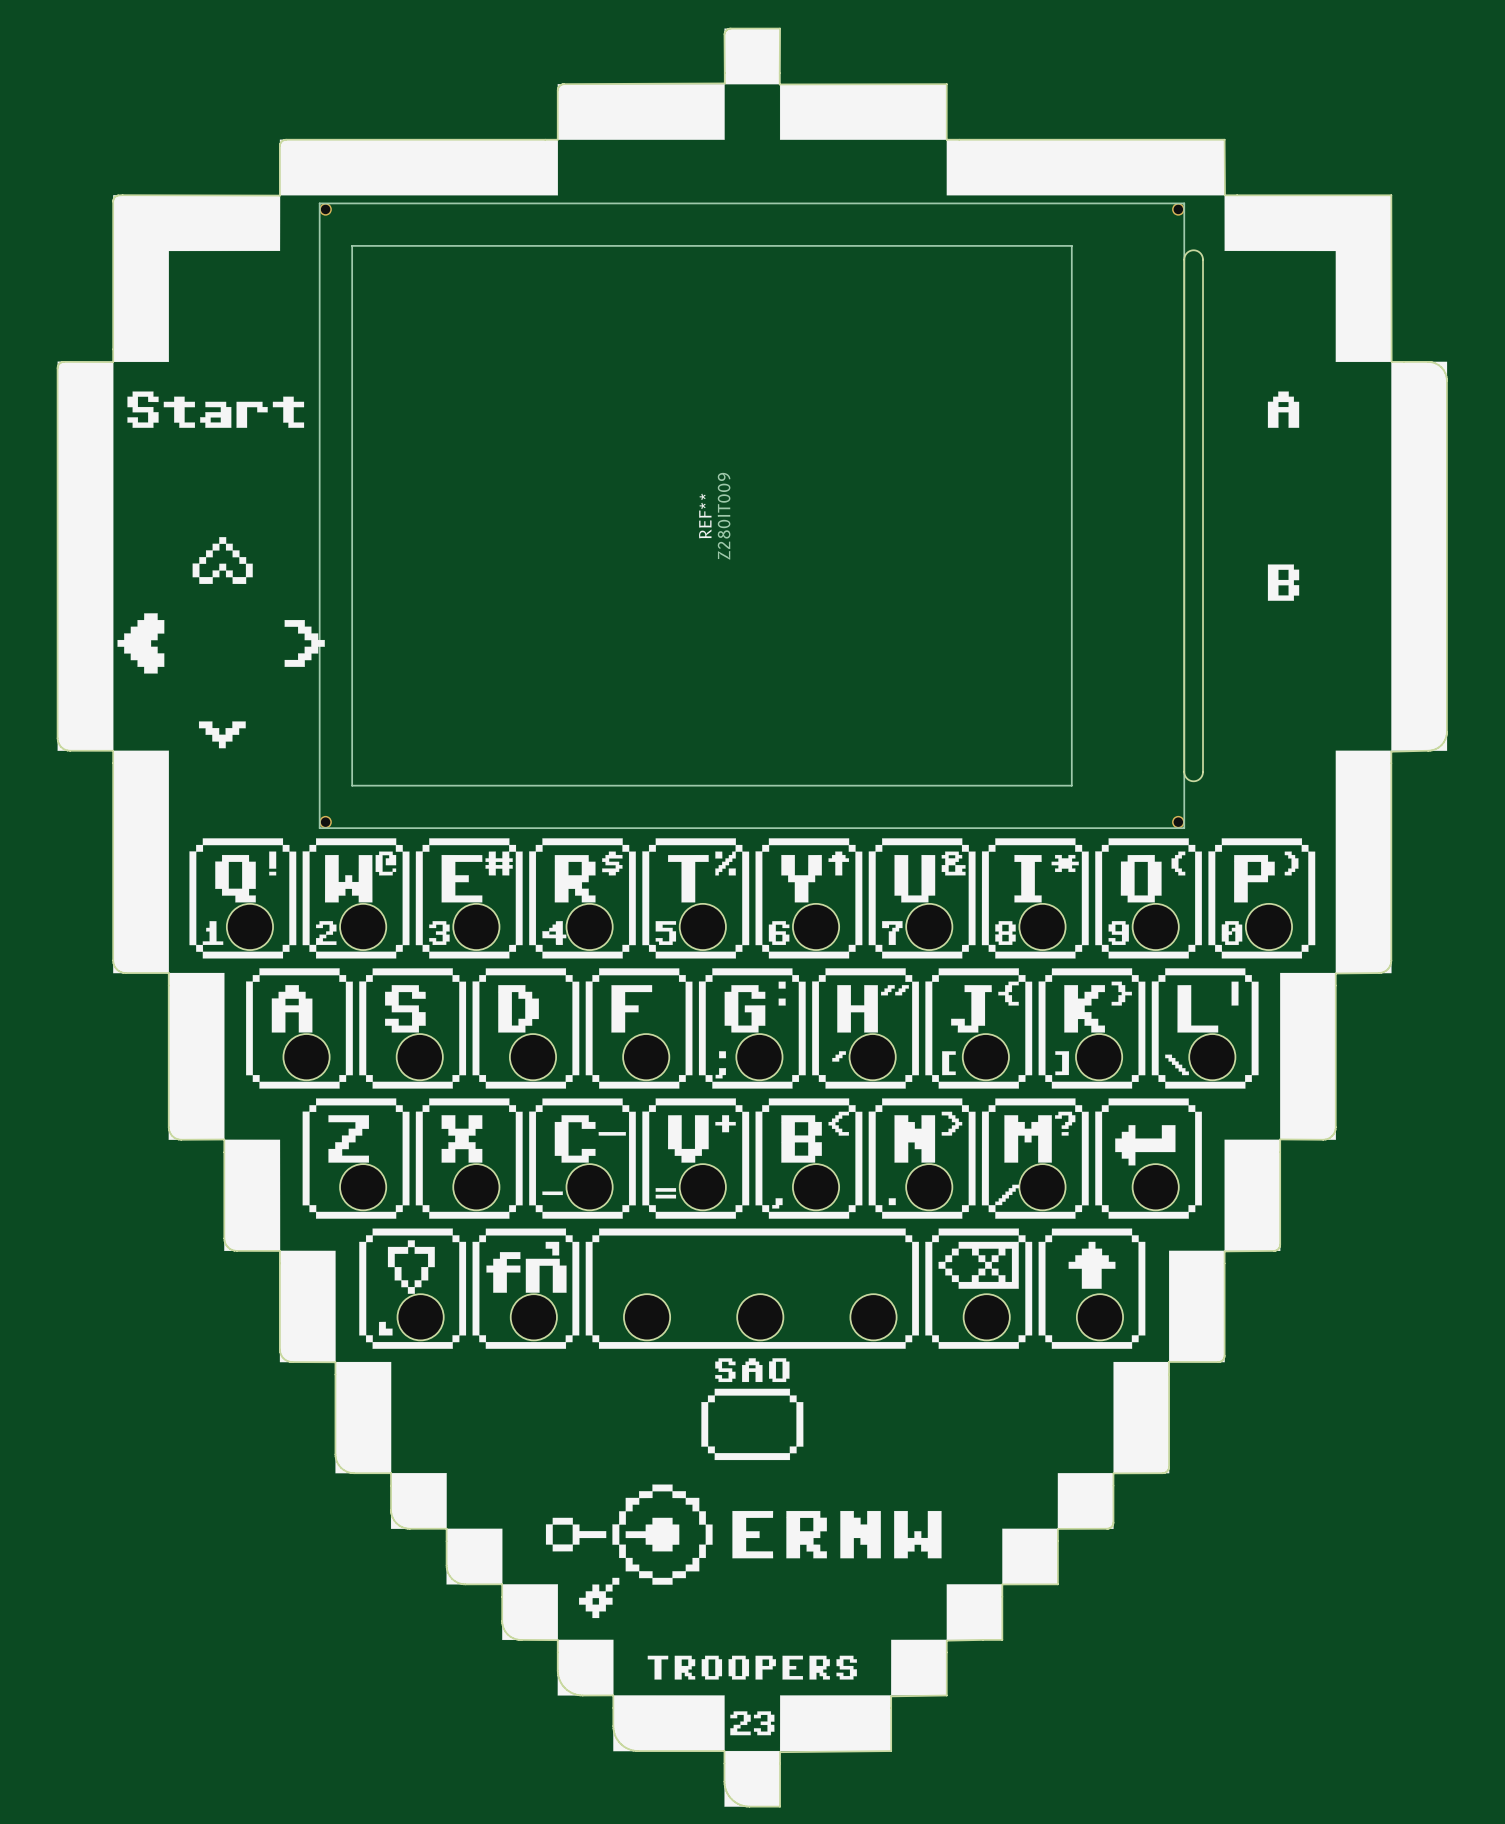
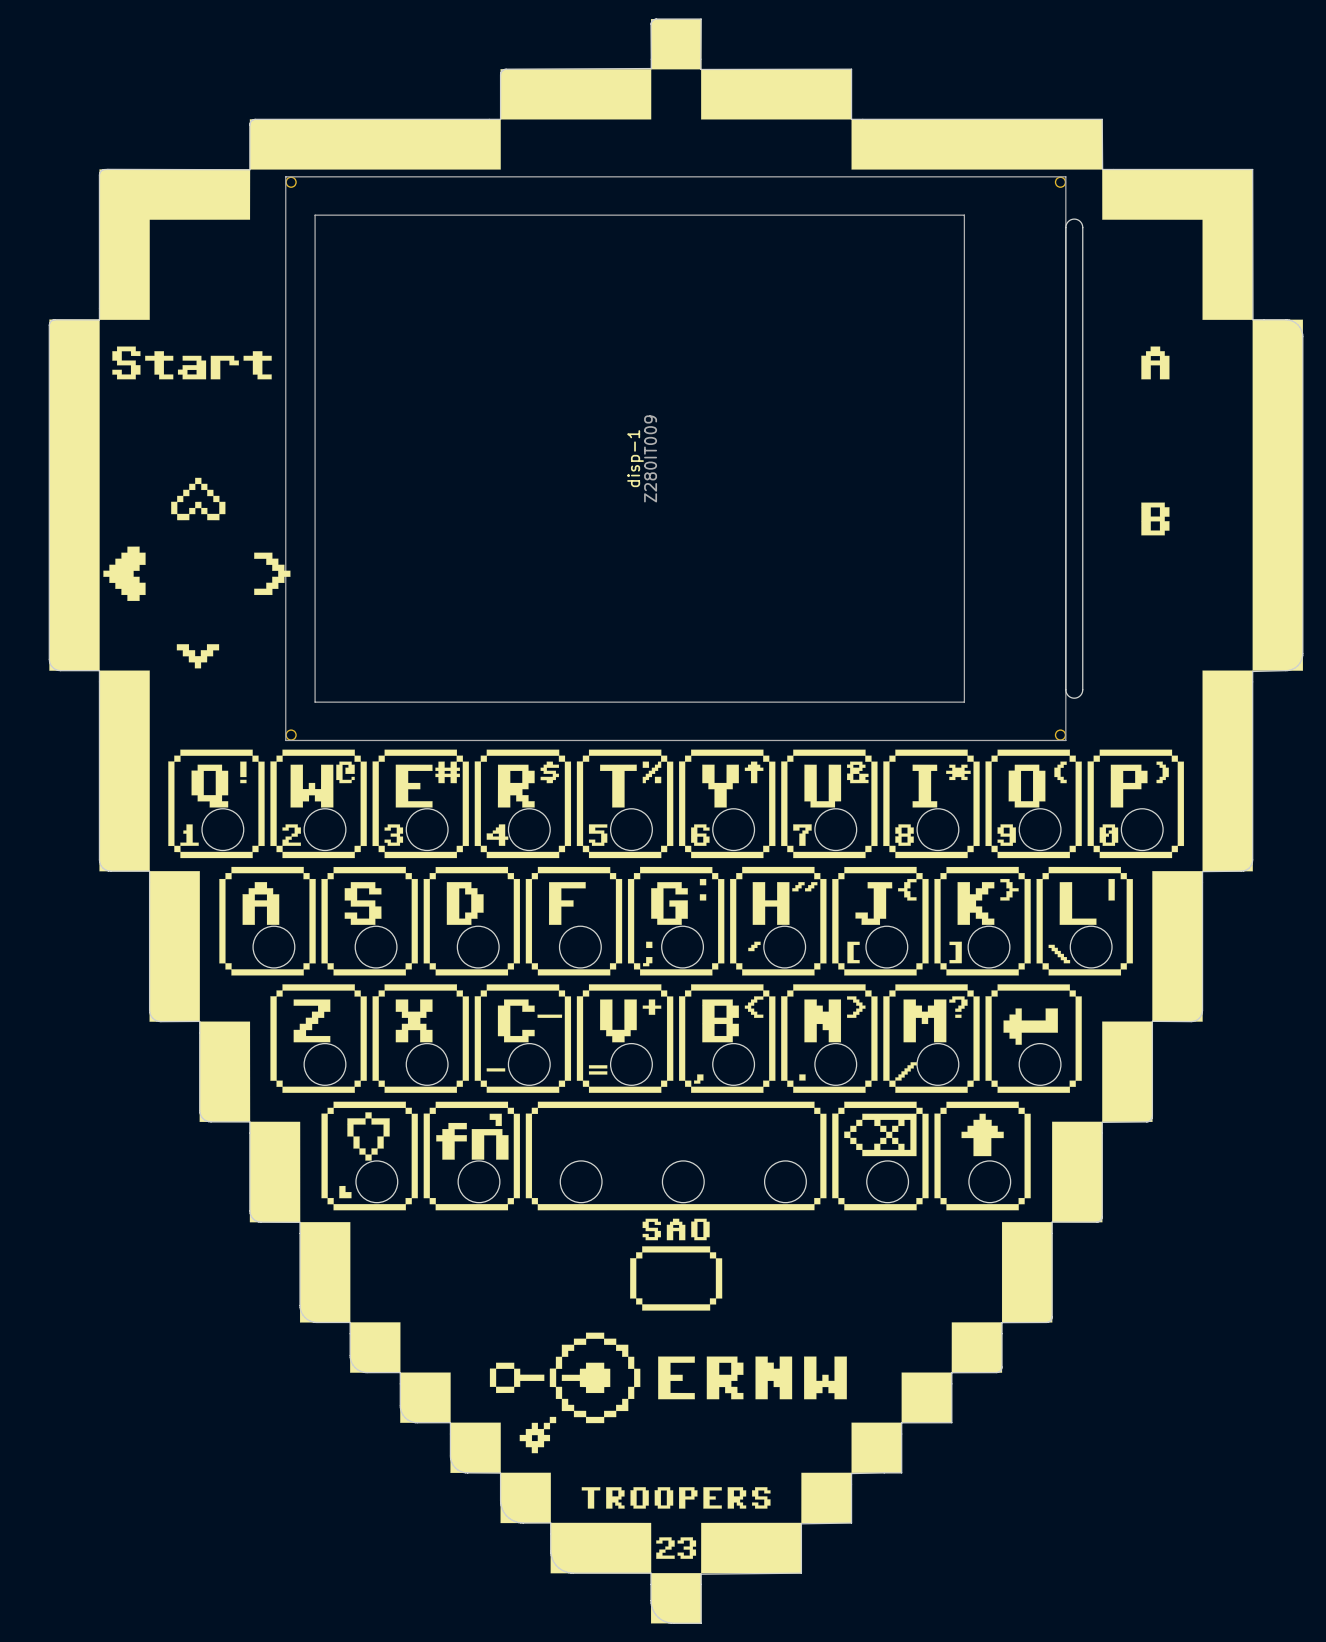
REF** name: REF** (705, 516) -> disp-1 (635, 458)

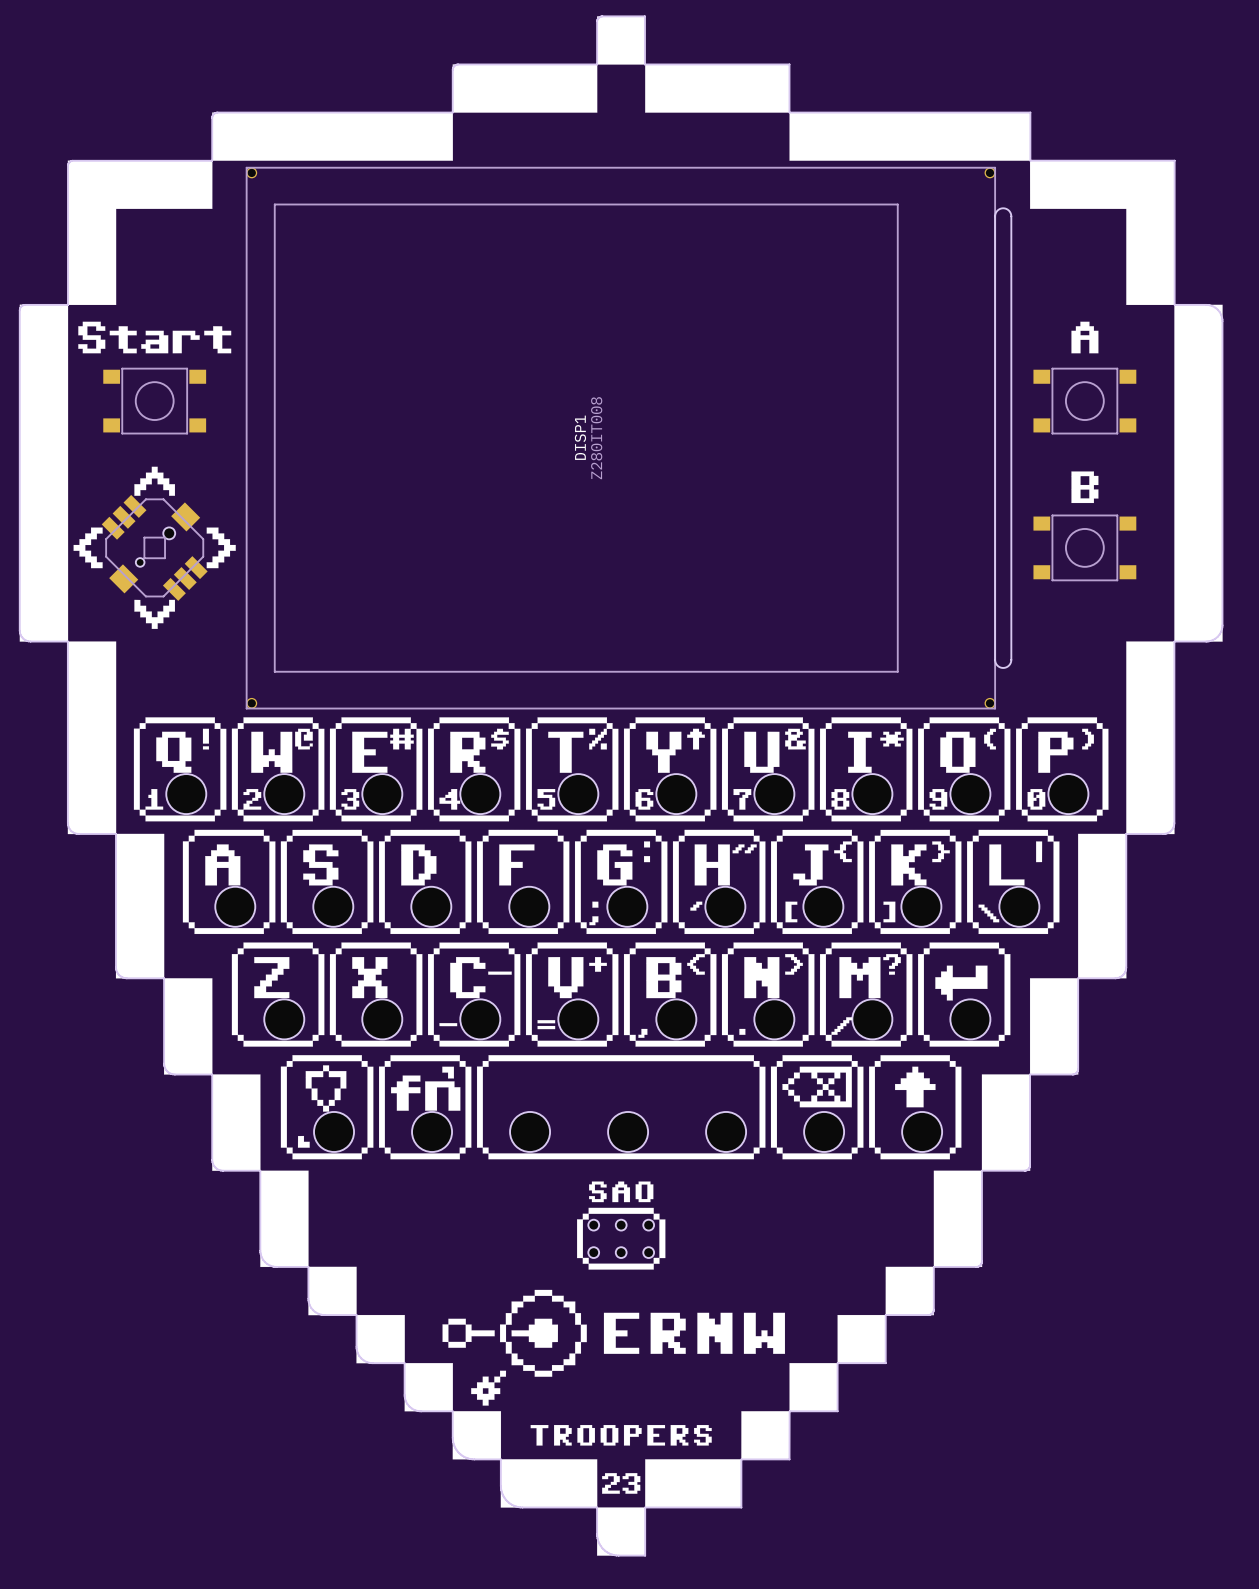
drawing shape: [48, 18, 1304, 1624] -> [19, 15, 1224, 1557]
part: none -> (154, 401)
part: none -> (1084, 401)
disp-1 name: disp-1 (635, 458) -> DISP1 (580, 437)
disp-1 value: Z280IT009 (650, 458) -> Z280IT008 (596, 438)
part: none -> (154, 547)
part: none -> (1084, 547)
part: none -> (621, 1238)

